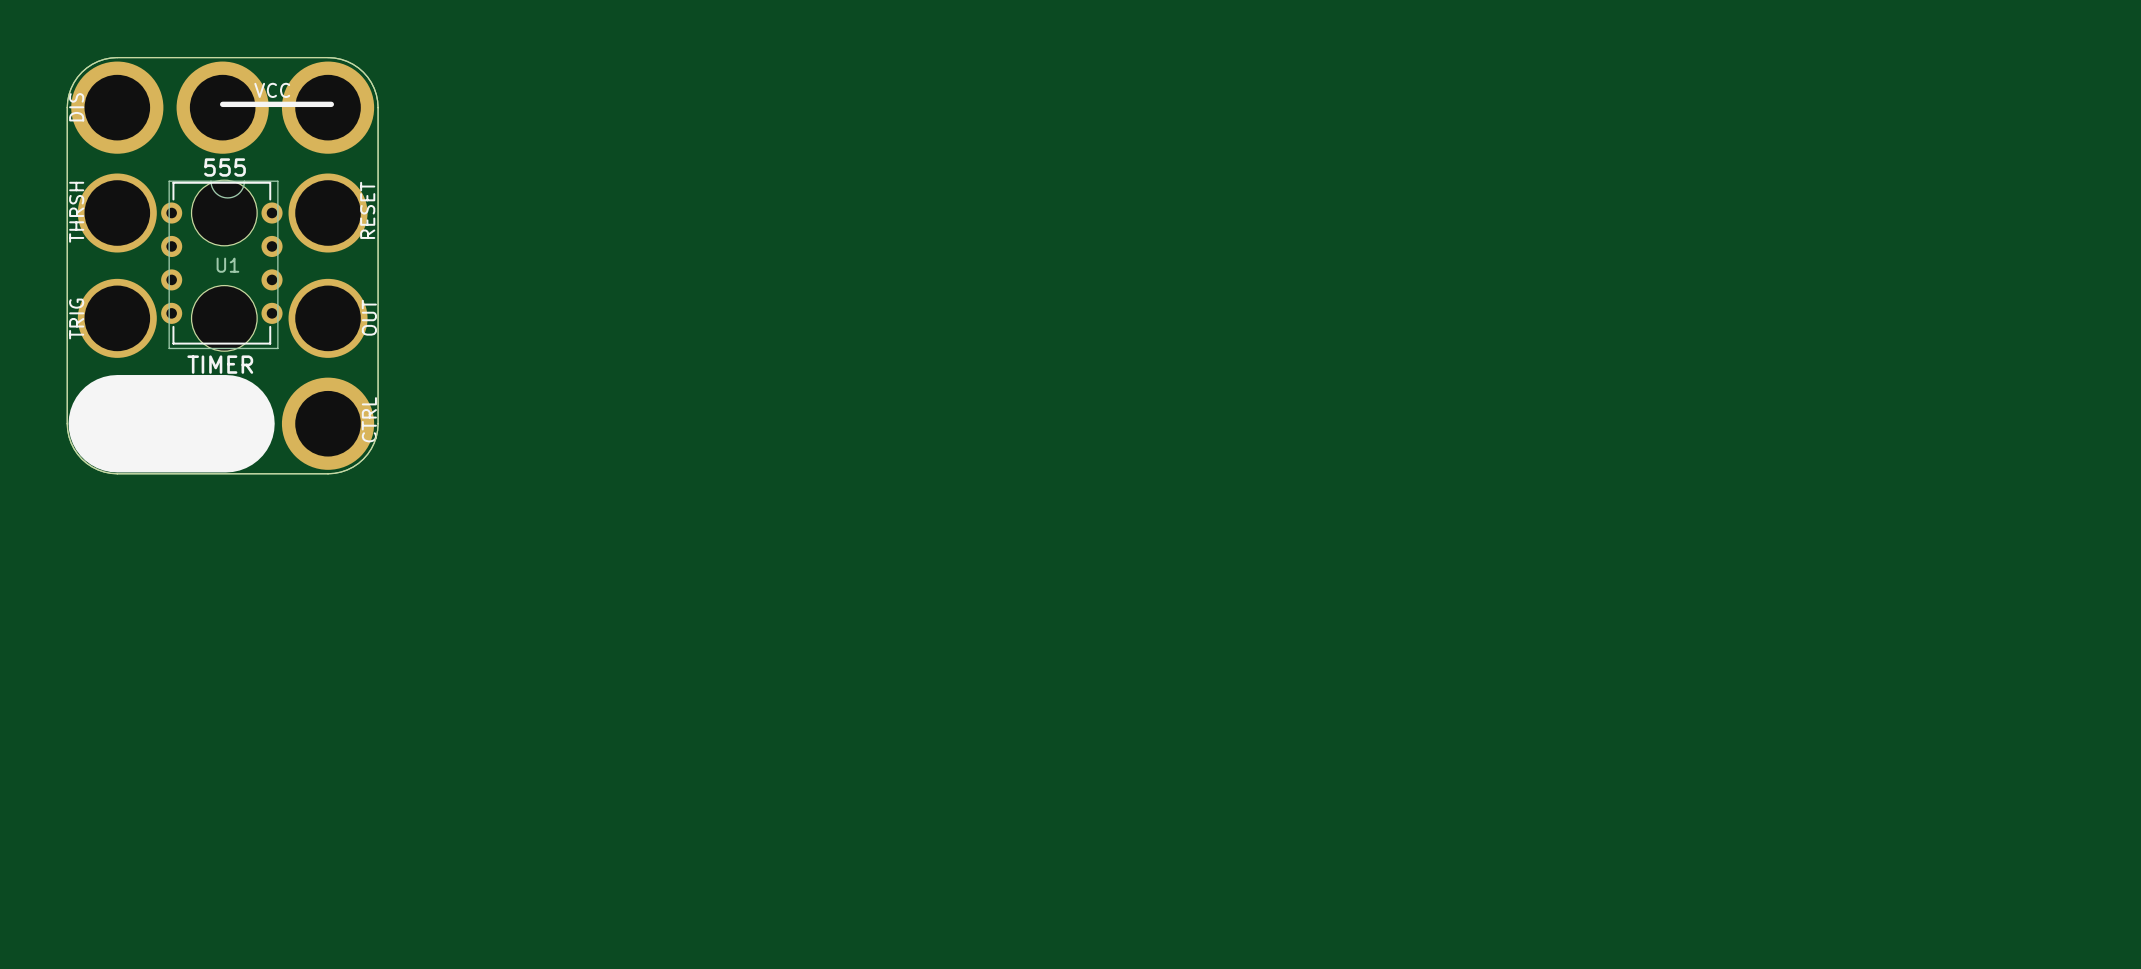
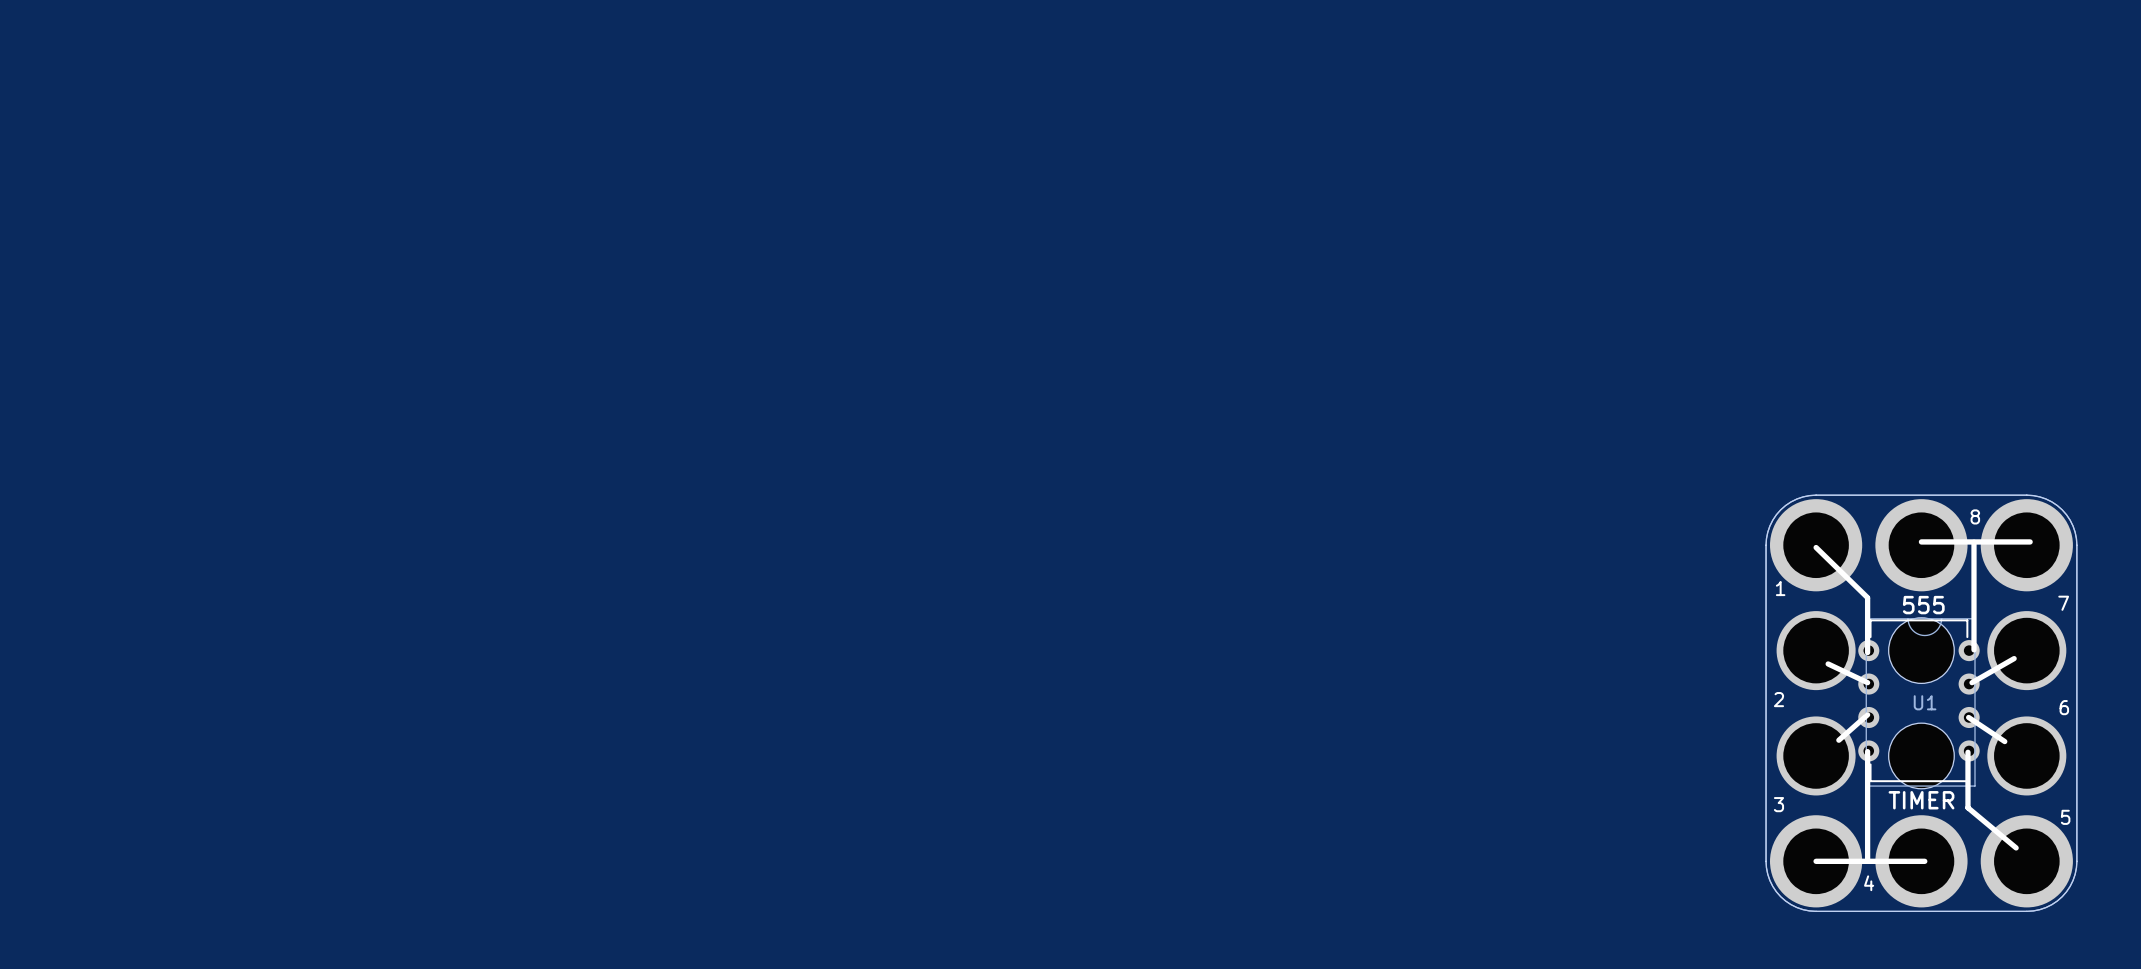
U1 footprint: [66, 57, 379, 475] -> [1765, 494, 2078, 912]
text: none -> TIMER (1921, 800)

